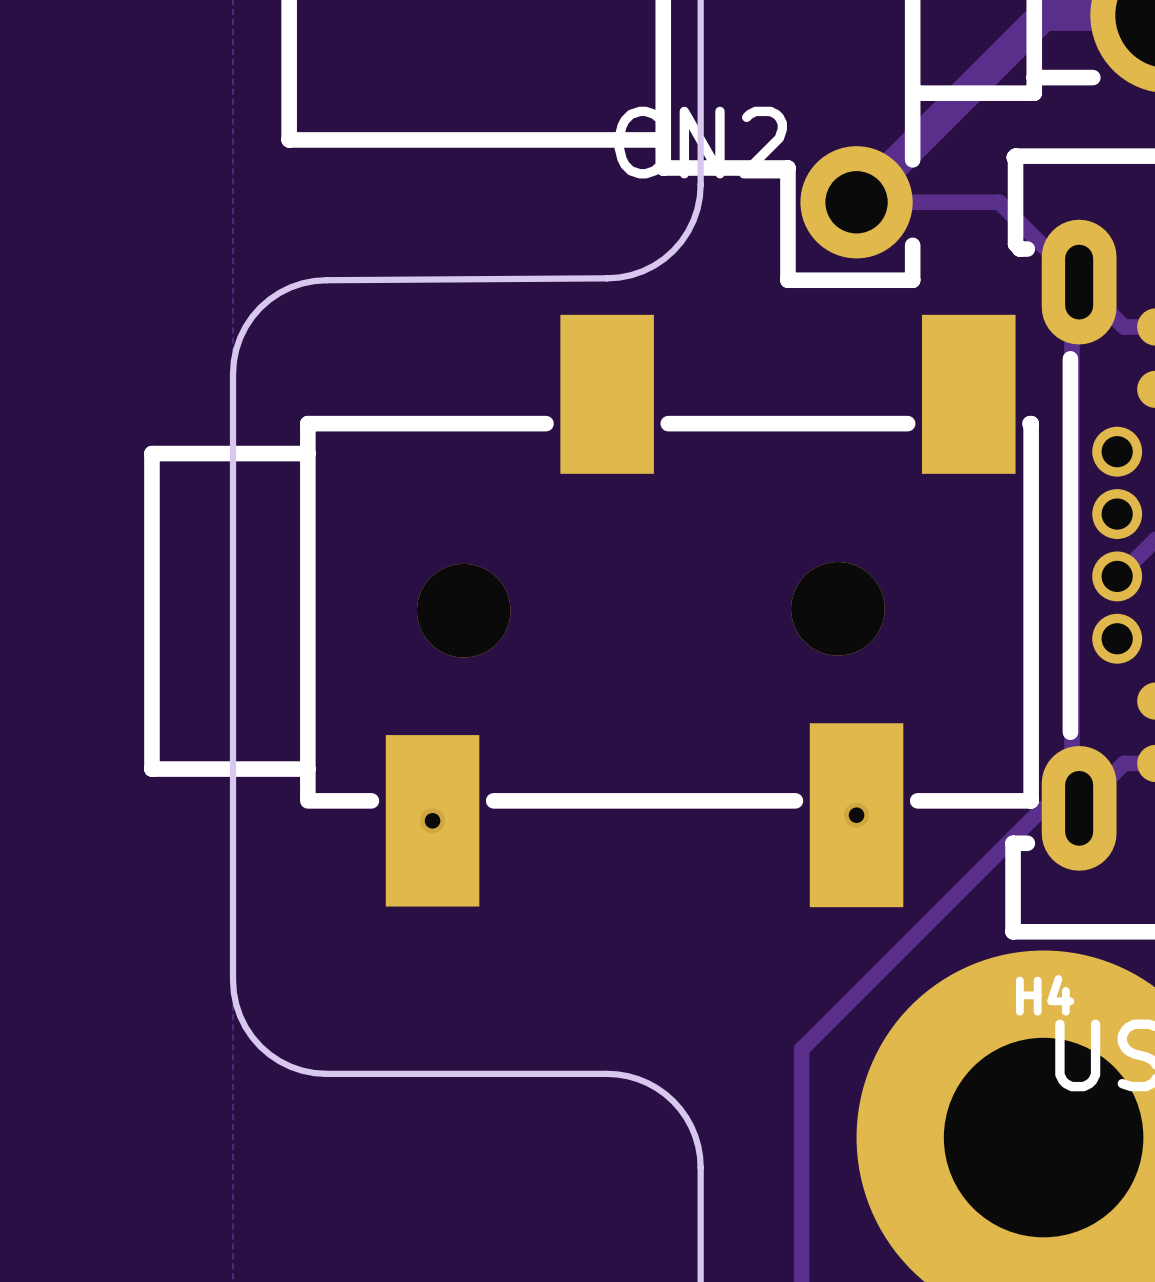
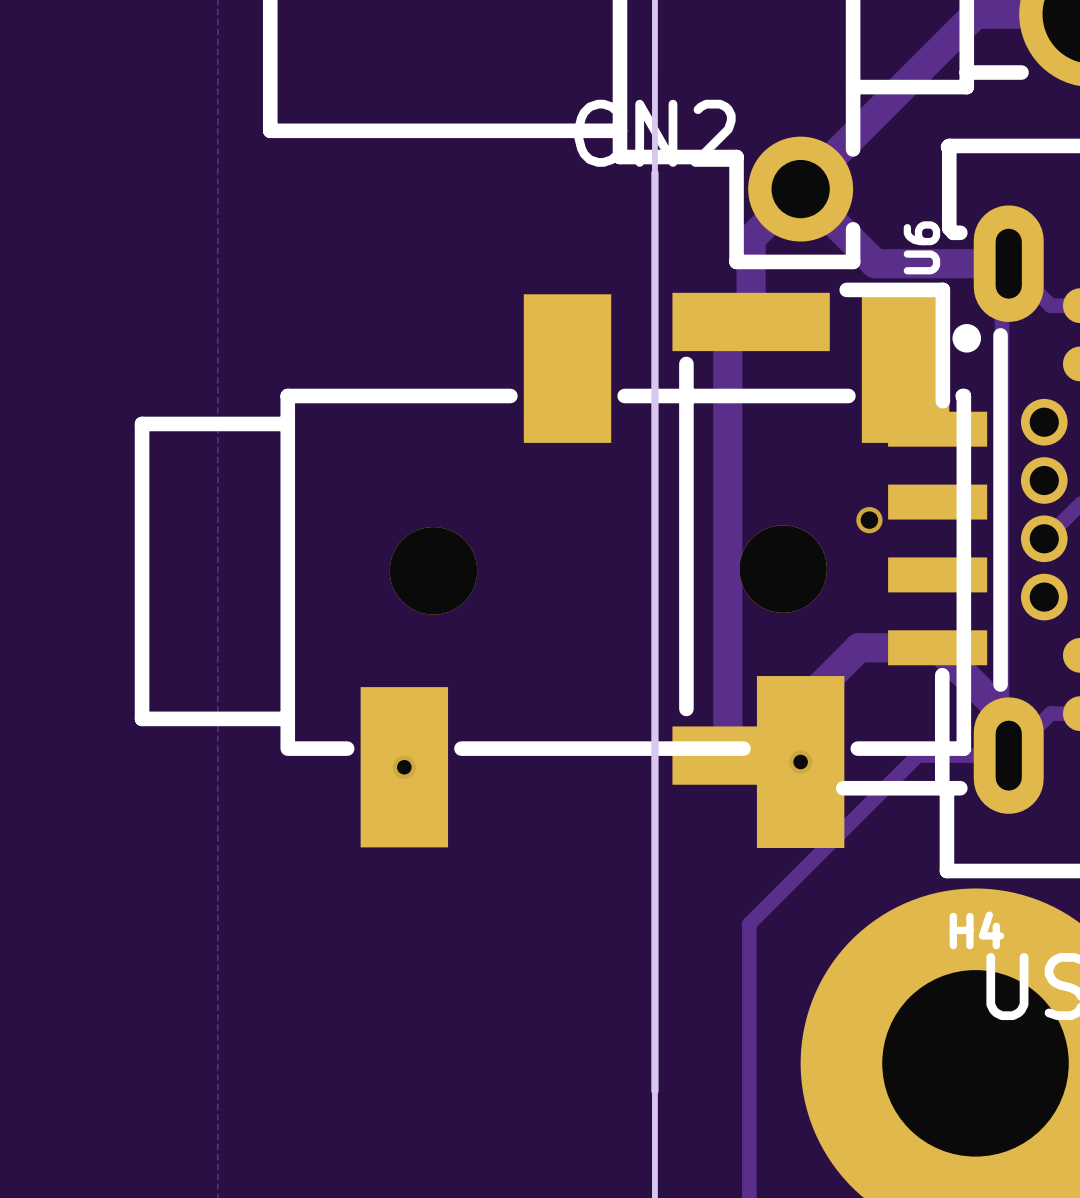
board edge: (700, 184) (699, 197) (693, 220) (681, 241) (664, 259) (642, 271) (619, 277) (607, 278) (326, 280) (302, 283) (279, 292) (269, 299) (252, 316) (245, 326) (236, 349) (233, 373) (233, 980) (236, 1004) (245, 1027) (260, 1046) (279, 1061) (302, 1070) (314, 1073) (607, 1073) (638, 1079) (656, 1088) (680, 1109) (695, 1136) (700, 1167) -> (654, 172) (654, 1091)
track: (856, 202) (999, 202) (1079, 282) -> (1008, 755) (1008, 718) (937, 647) (858, 647) (751, 755) (727, 732) (727, 345) (751, 321) (751, 238) (800, 189) (875, 263) (1008, 263)
via: none -> (869, 520)
U6: none -> (829, 539)
track: (1042, 808) (801, 1049) -> (974, 755) (917, 755) (749, 924) (749, 980)

